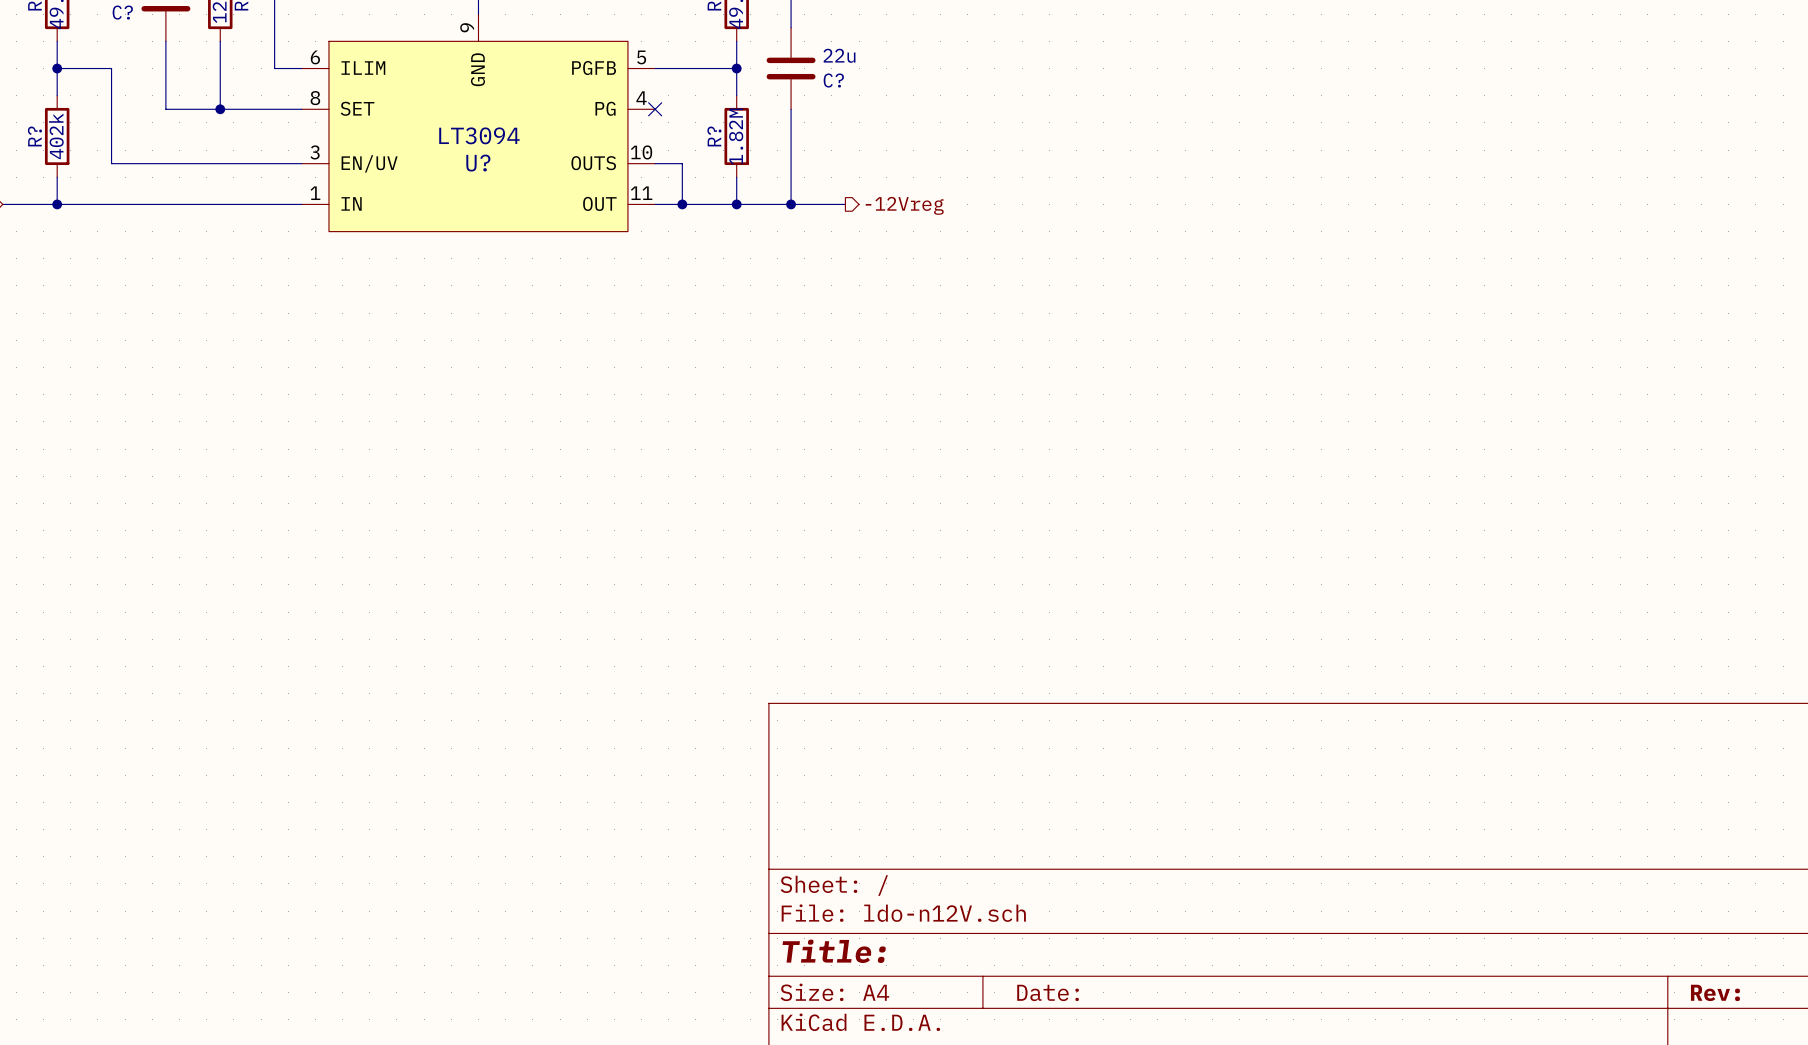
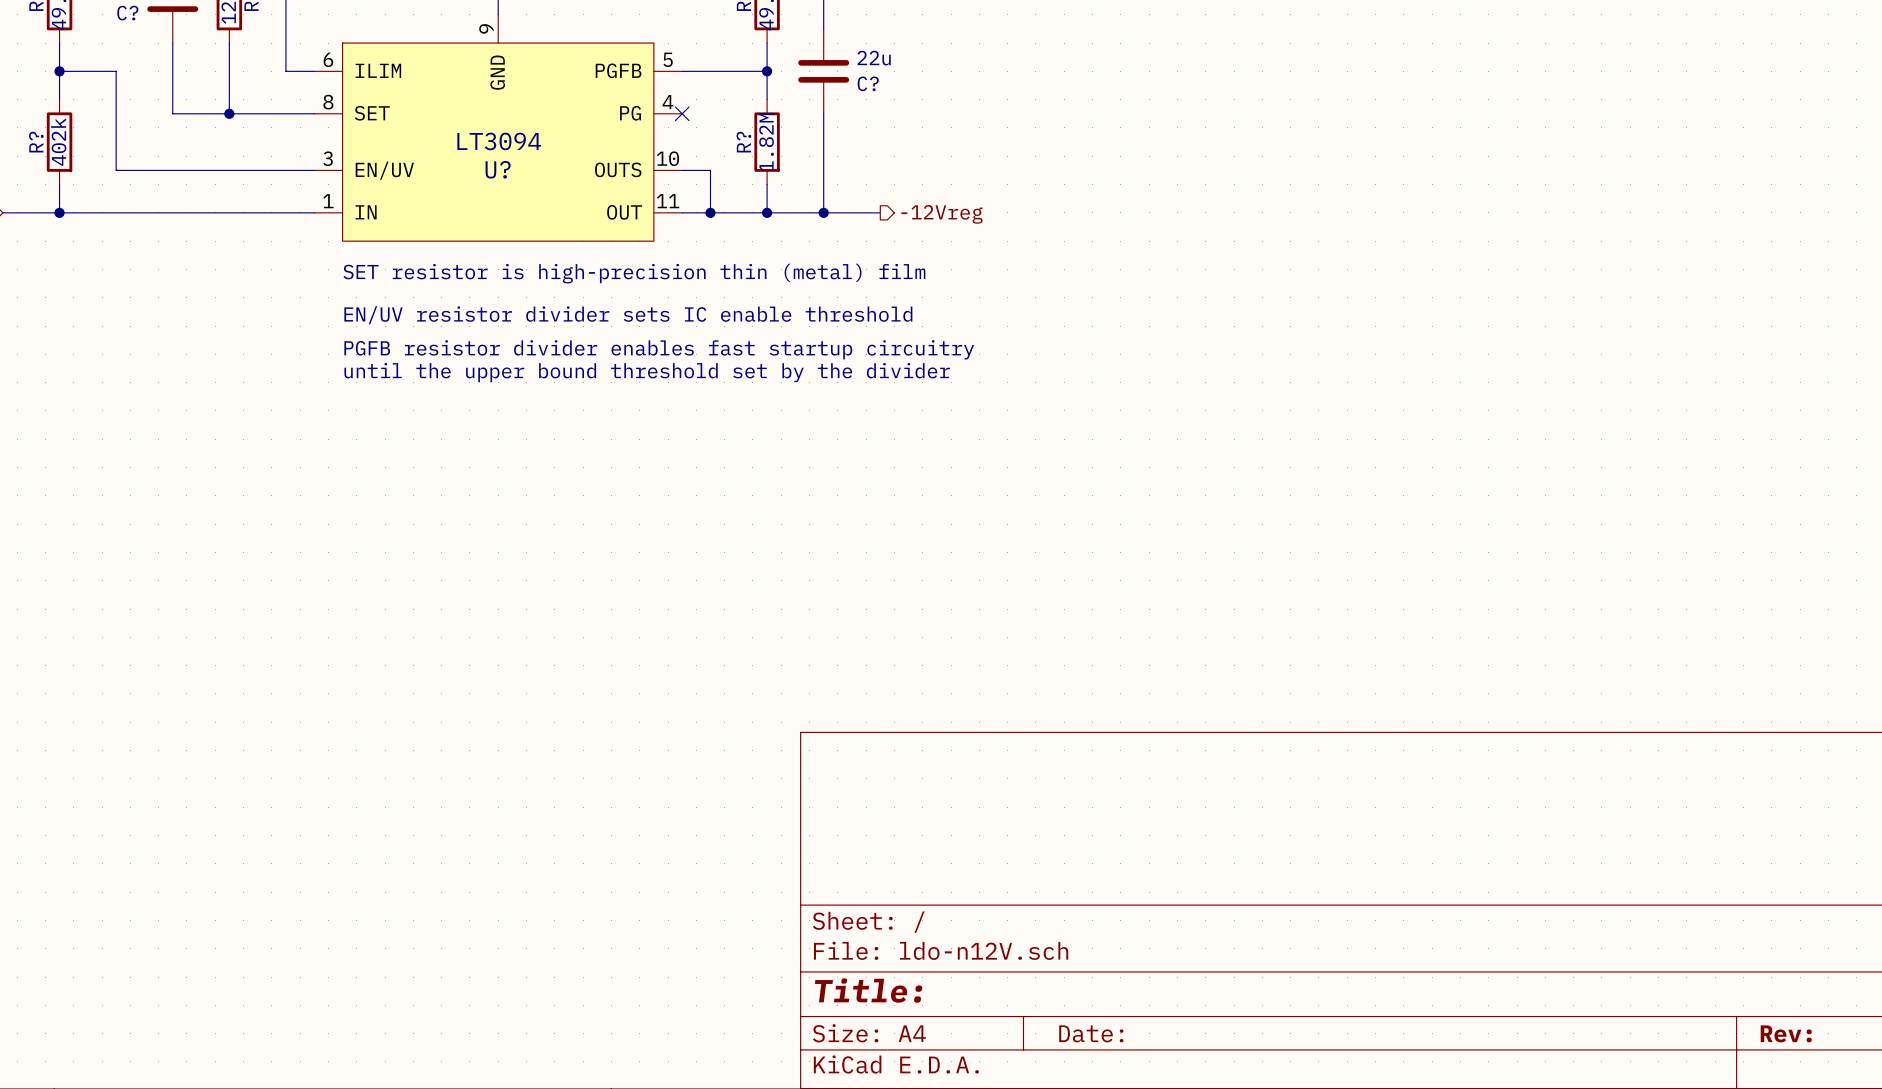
text: none -> SET resistor is high-precision thin (metal) film (634, 273)
text: none -> EN/UV resistor divider sets IC enable threshold (628, 315)
text: none -> PGFB resistor divider enables fast startup circuitry (659, 349)
text: none -> until the upper bound threshold set by the divider (647, 372)

